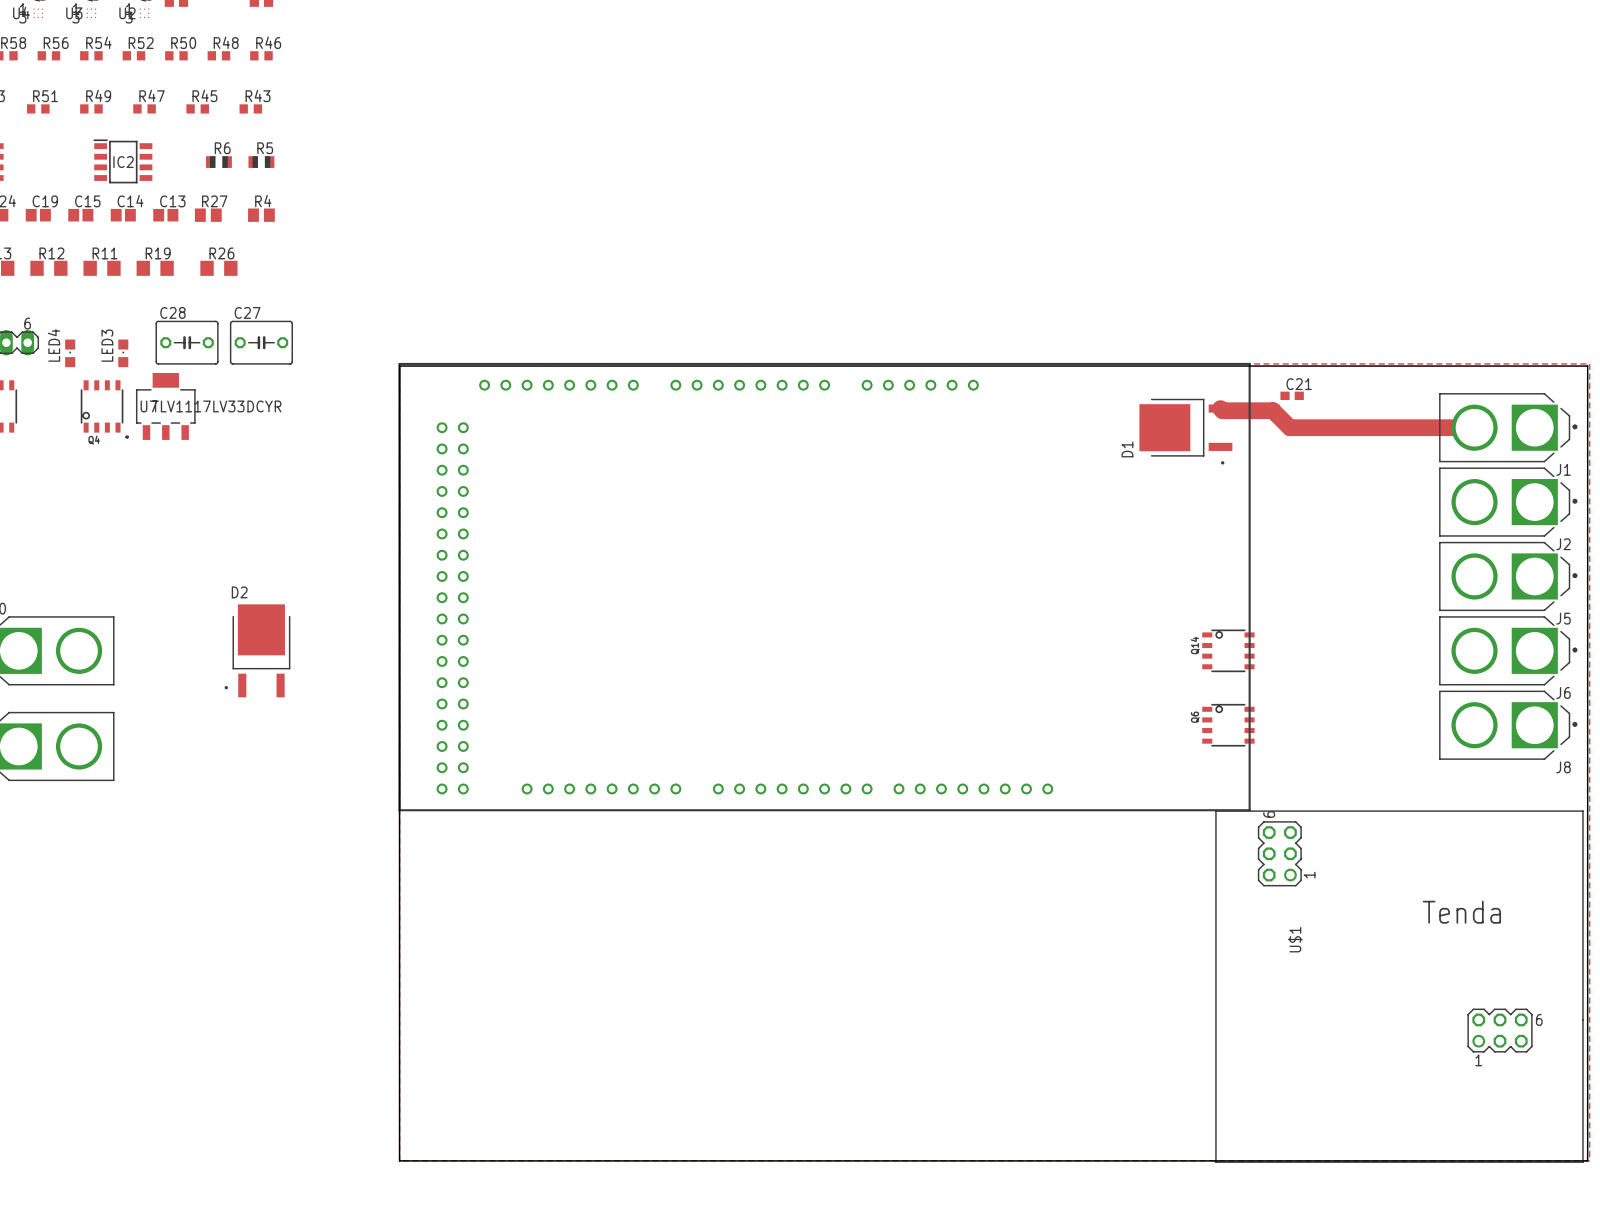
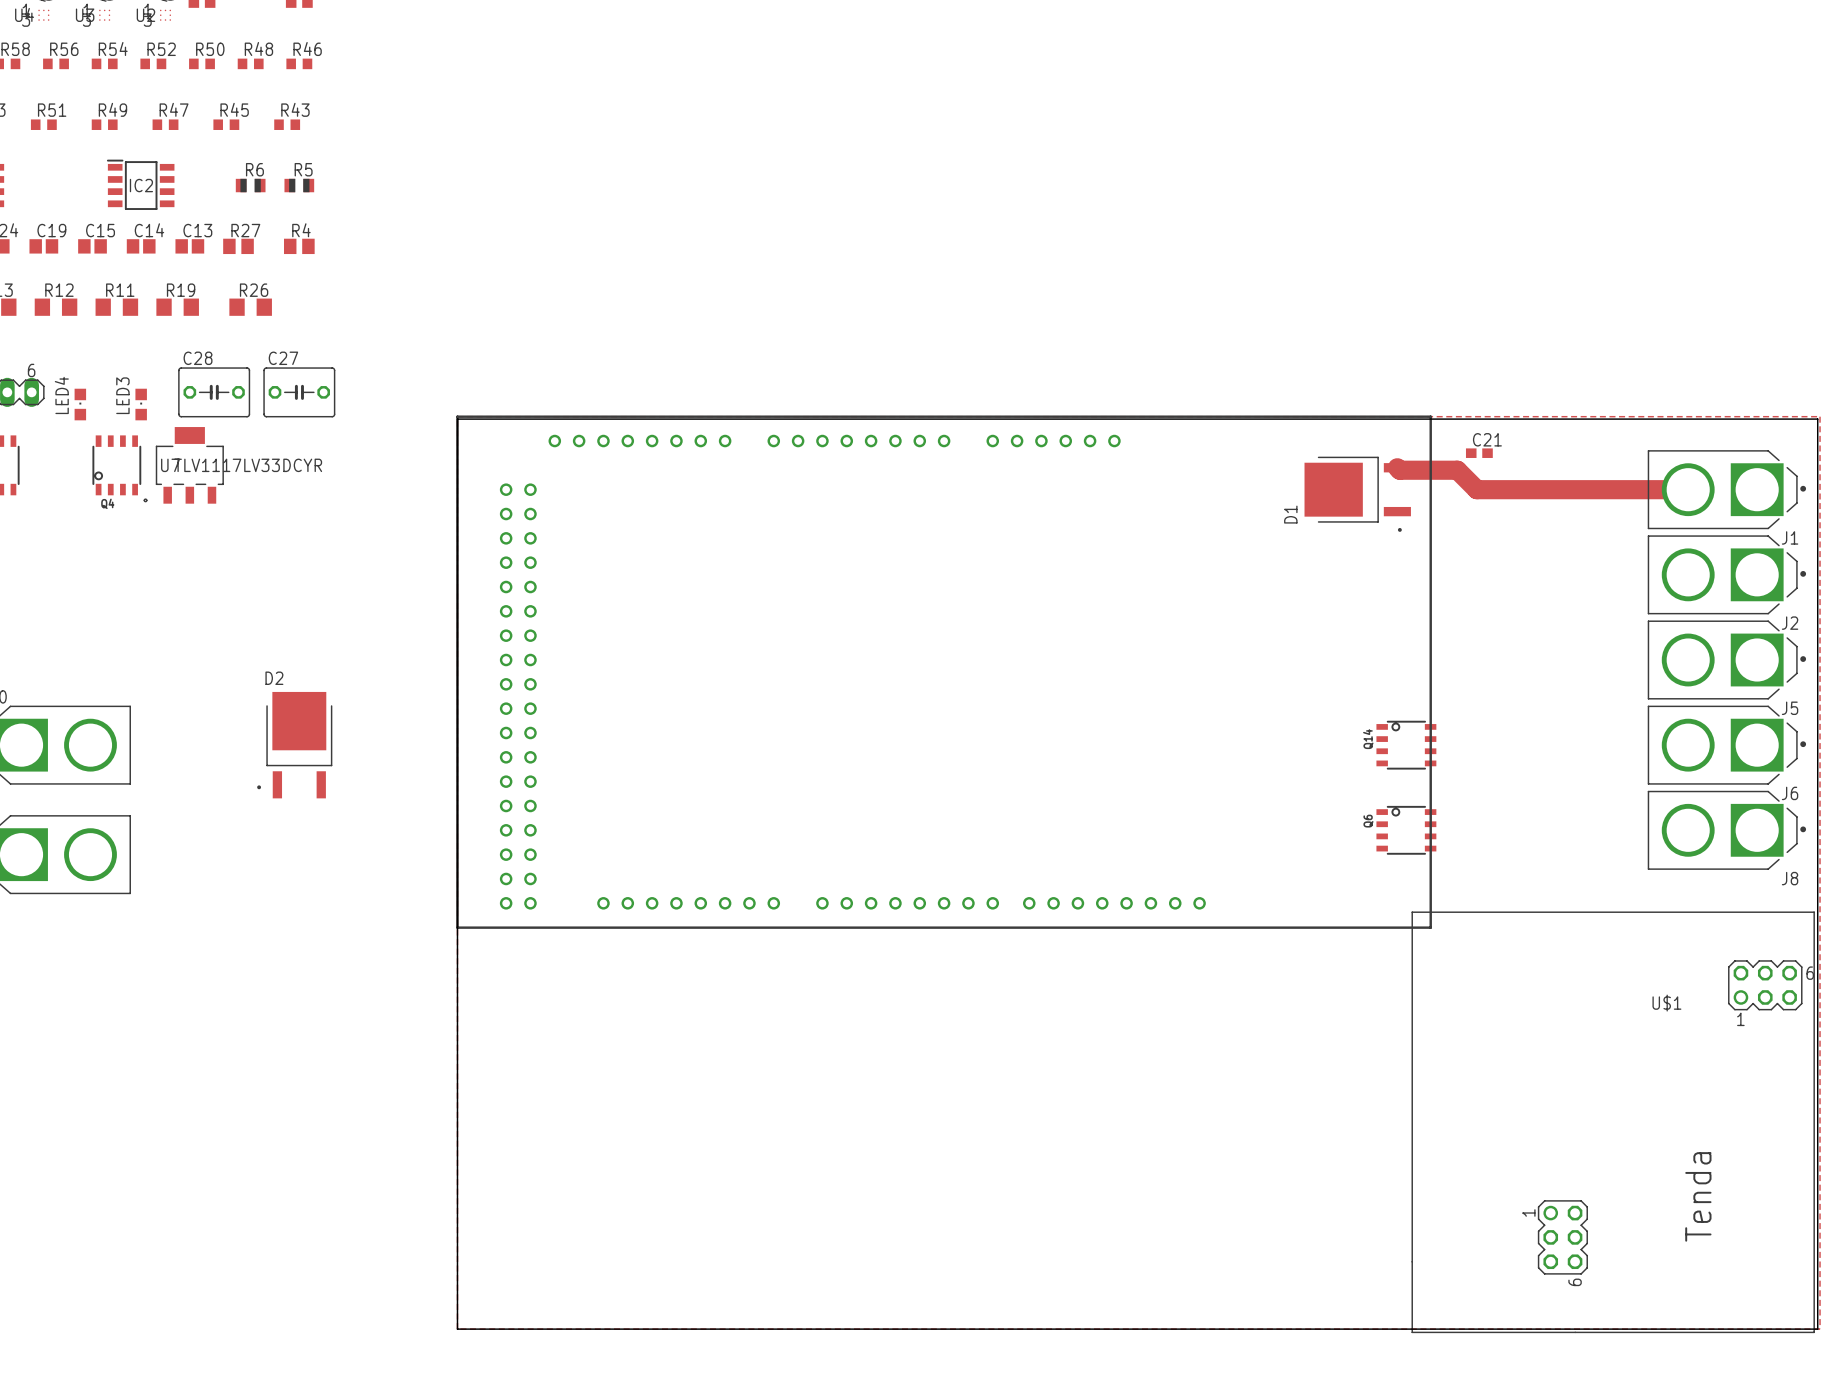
U$1 footprint: [1215, 810, 1584, 1163] -> [1411, 911, 1815, 1334]
U$1 name position: U$1 (1295, 939) -> U$1 (1666, 1003)

